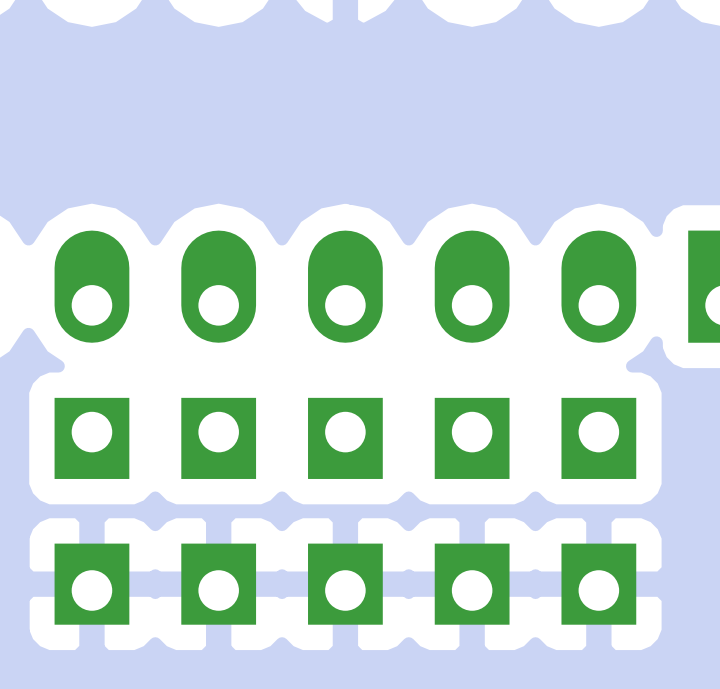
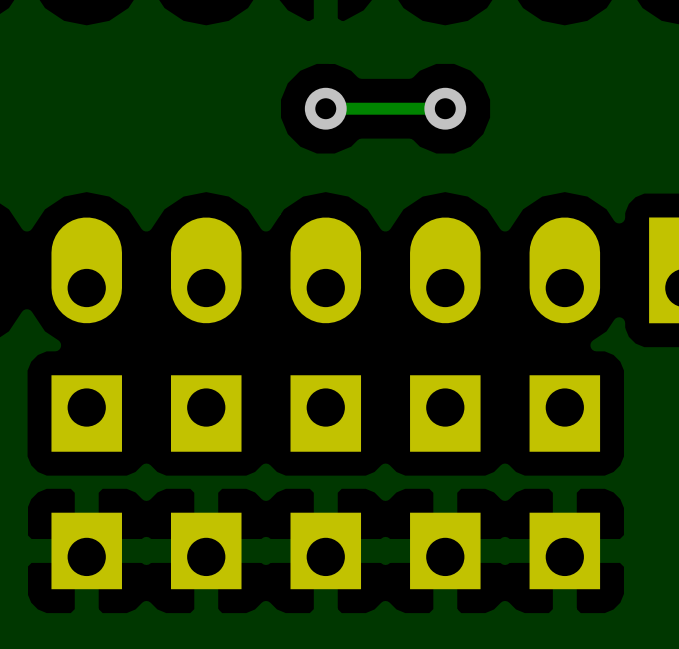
via: none -> (325, 108)
track: none -> (445, 108) (325, 108)
via: none -> (445, 108)

